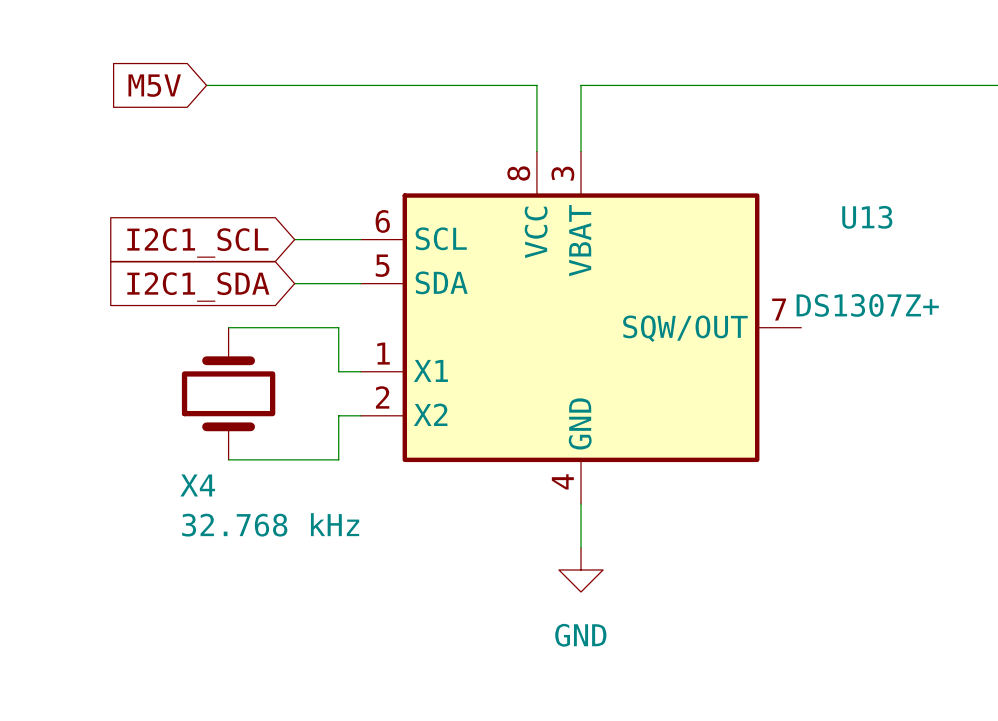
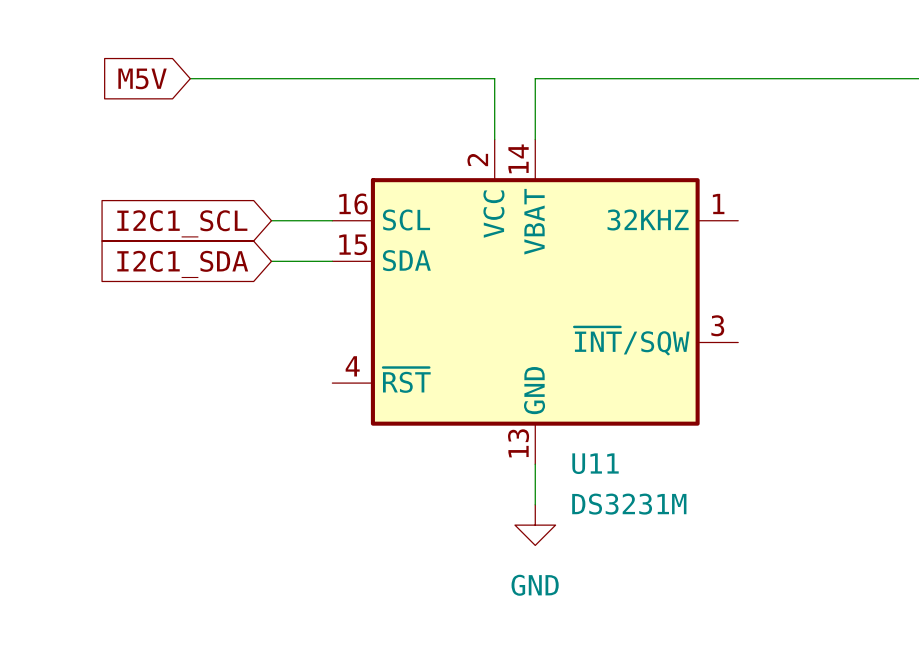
wire: (228, 327) (338, 327) (338, 371) (360, 371) -> none
U13: DS1307Z+ (581, 327) -> none
U11: none -> DS3231M (535, 301)
X4: 32.768 kHz (228, 393) -> none
wire: (360, 415) (338, 415) (338, 459) (228, 459) -> none

